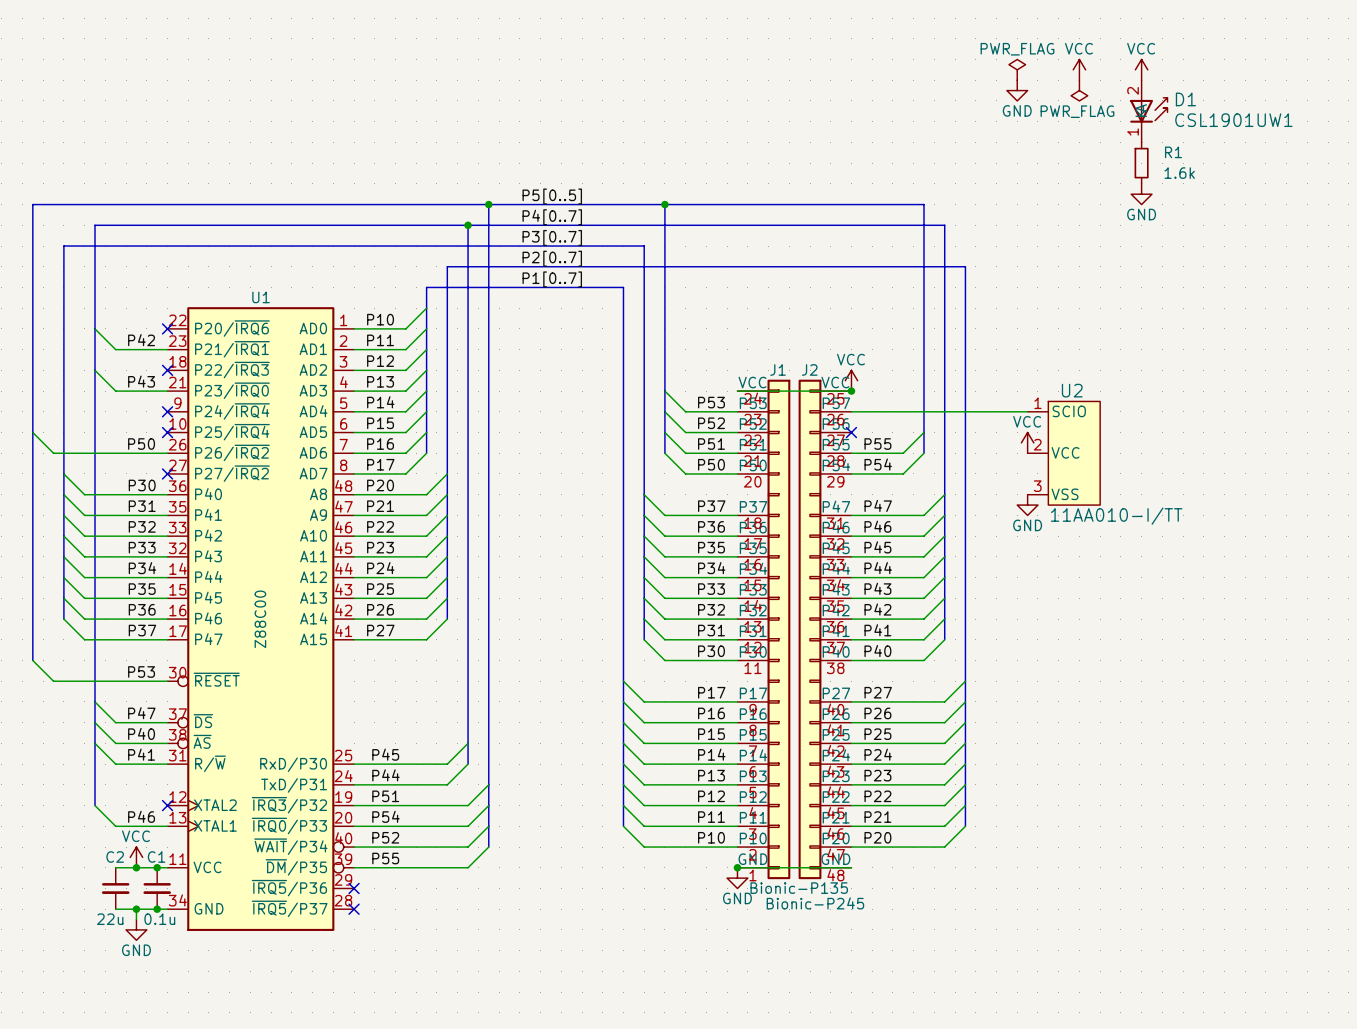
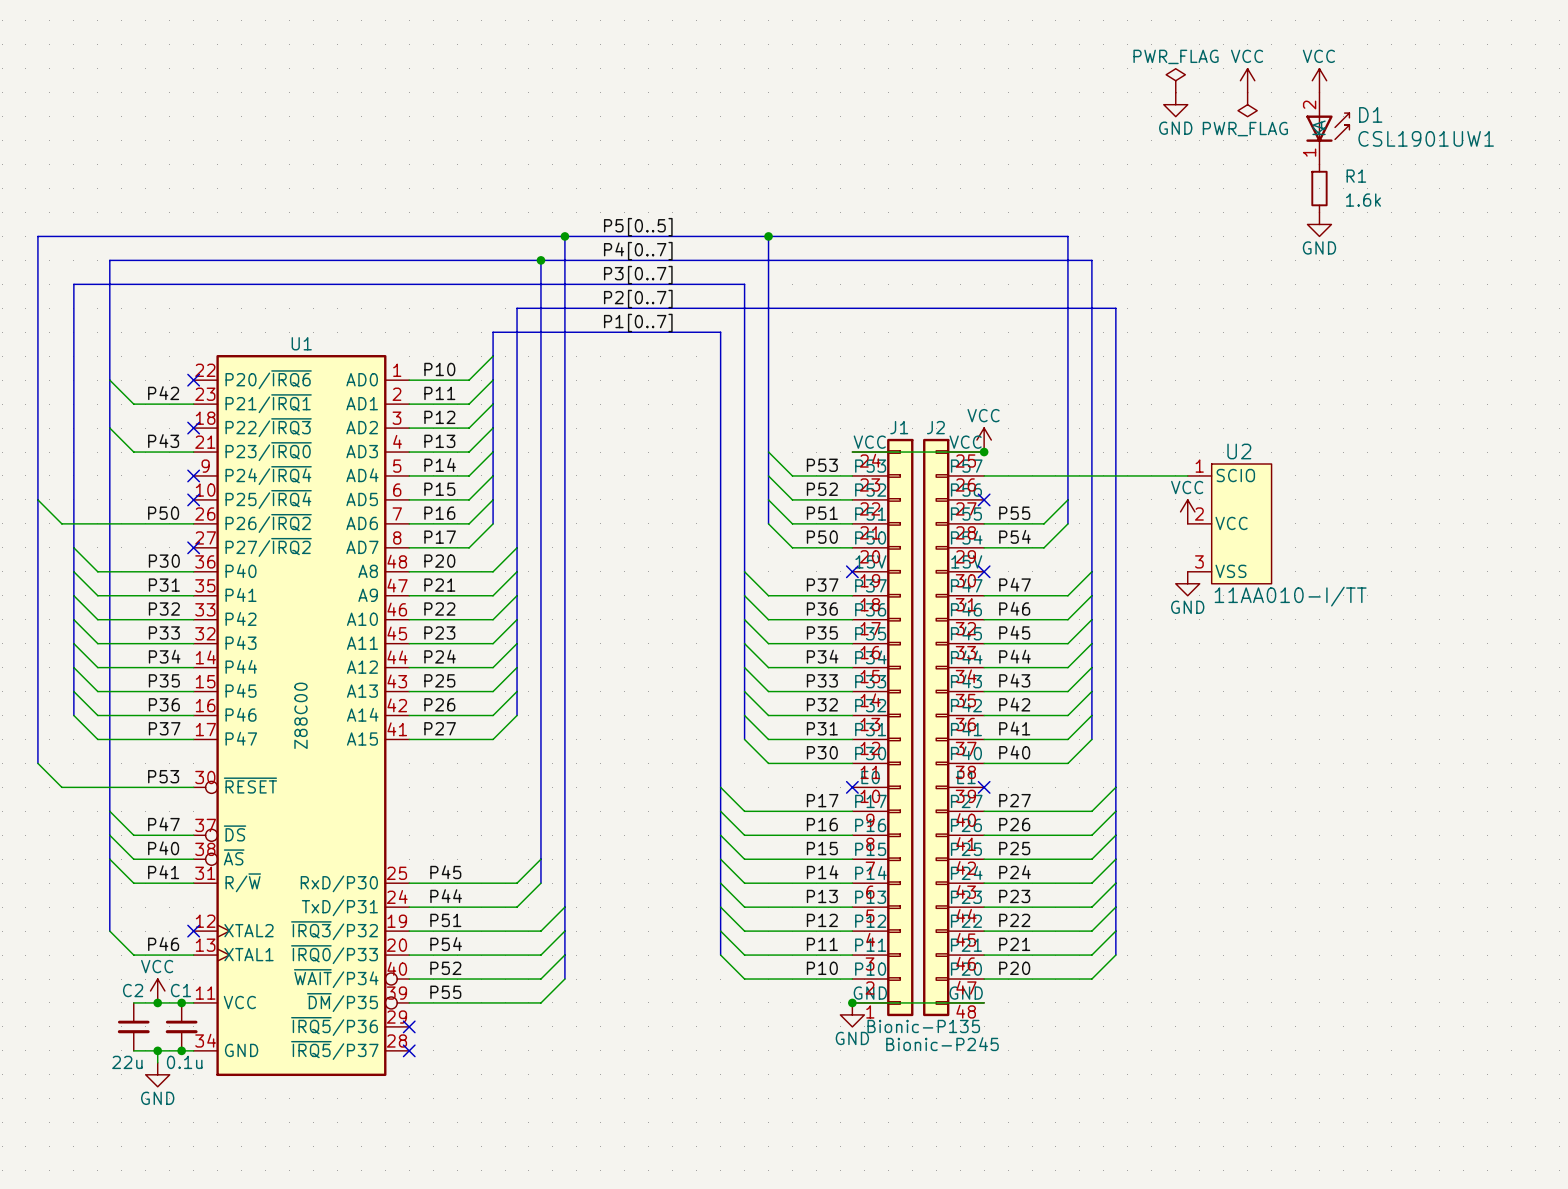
J1 symbol: [737, 379, 791, 880] -> [852, 438, 914, 1017]
J2 symbol: [798, 379, 852, 880] -> [923, 438, 985, 1017]
no-connect mark: none -> (852, 571)
no-connect mark: none -> (984, 571)
no-connect mark: none -> (852, 787)
no-connect mark: none -> (984, 787)

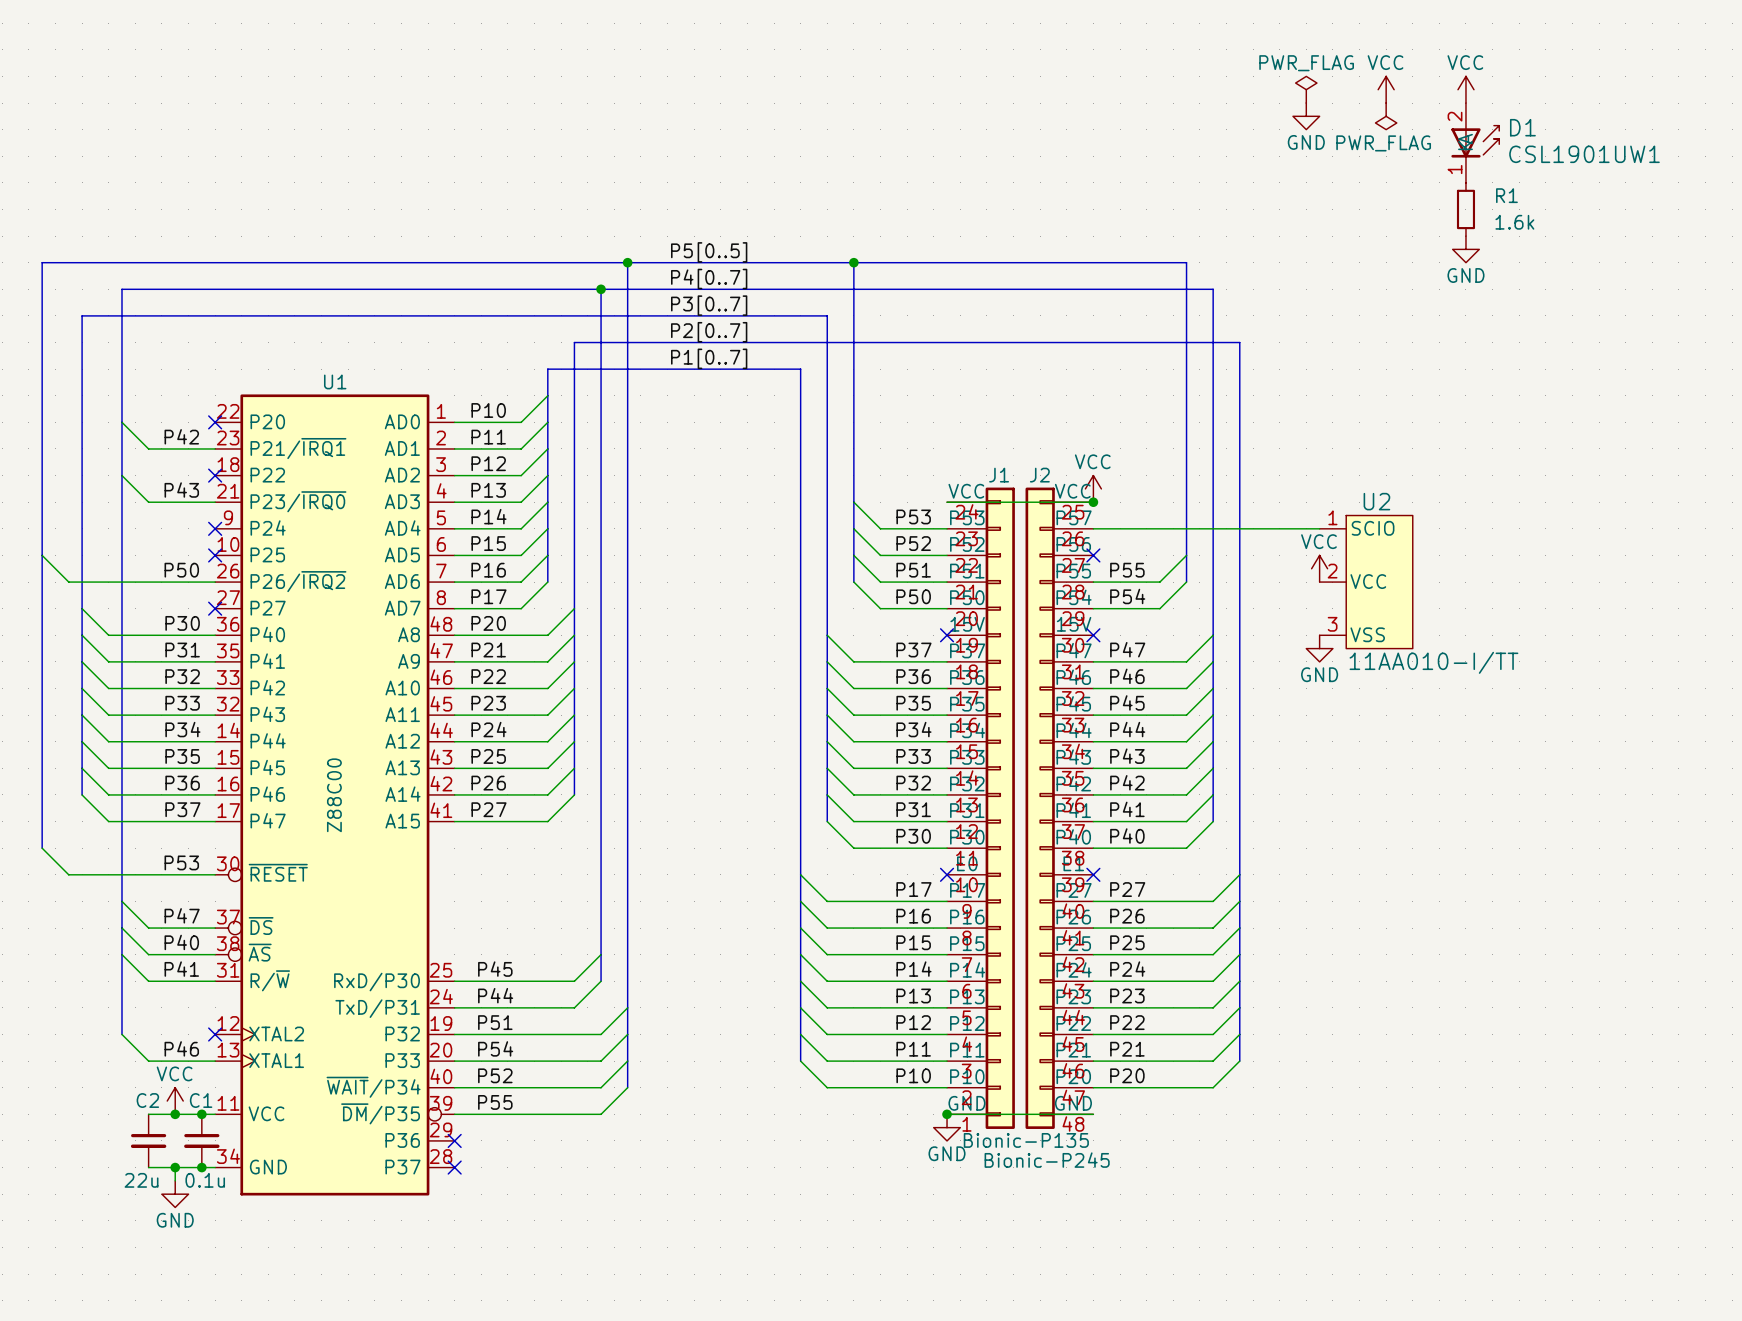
U1 symbol: [193, 355, 410, 1077] -> [215, 394, 455, 1196]

